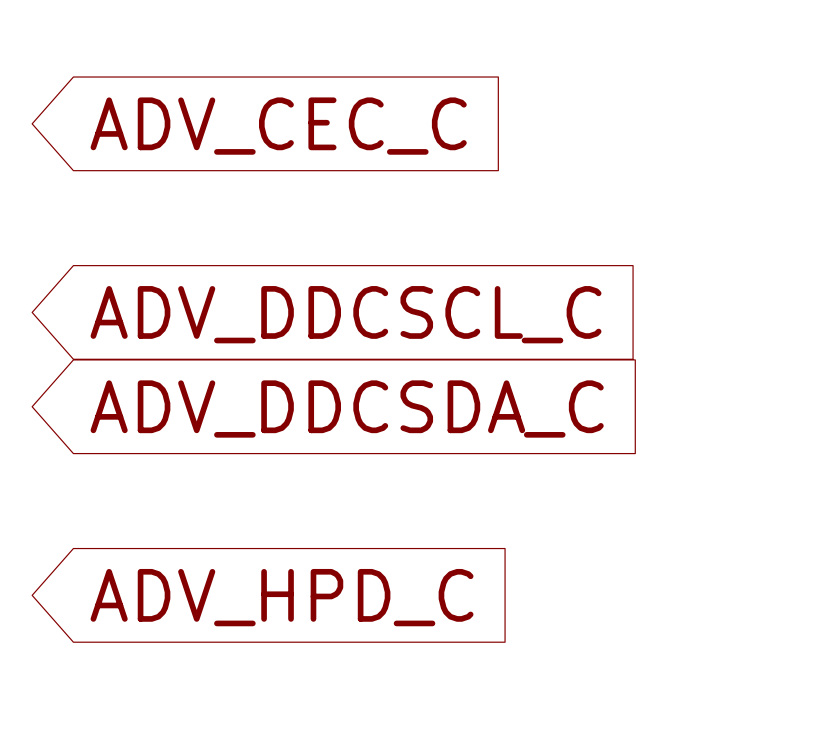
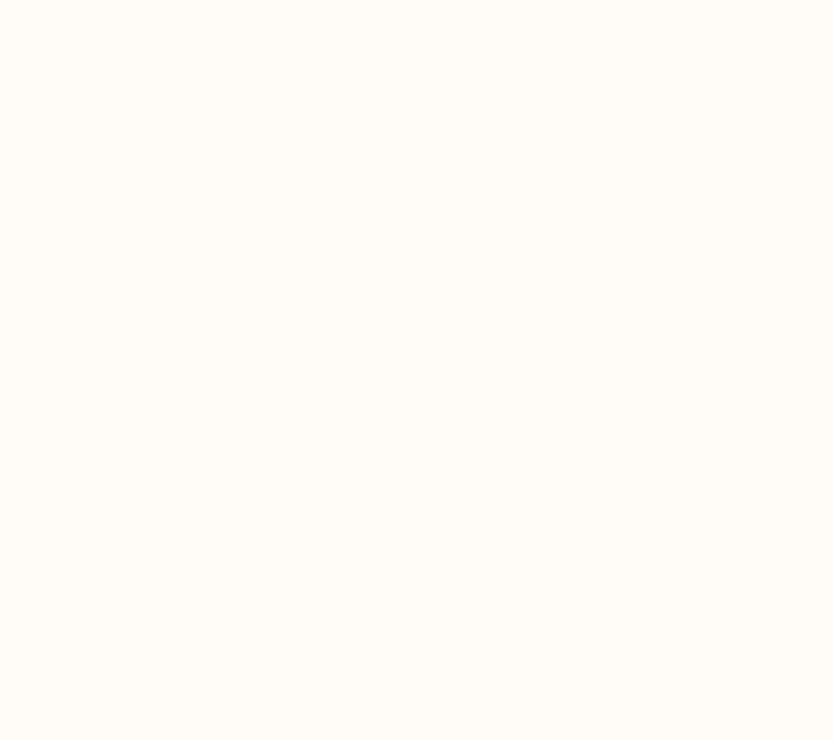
global label: ADV_CEC_C (278, 126) -> none
global label: ADV_DDCSCL_C (346, 314) -> none
global label: ADV_DDCSDA_C (347, 409) -> none
global label: ADV_HPD_C (282, 597) -> none

